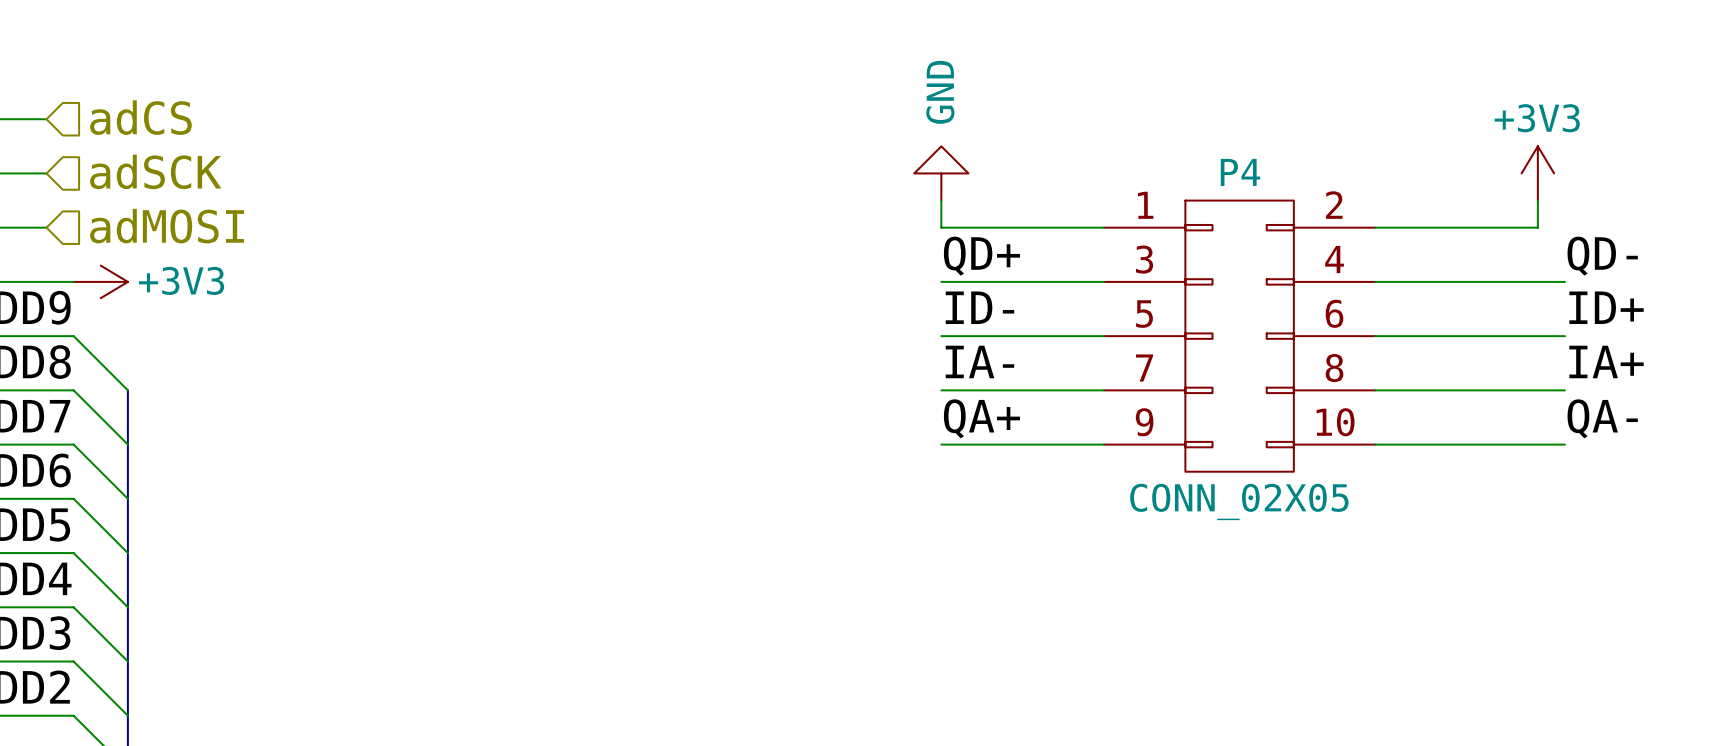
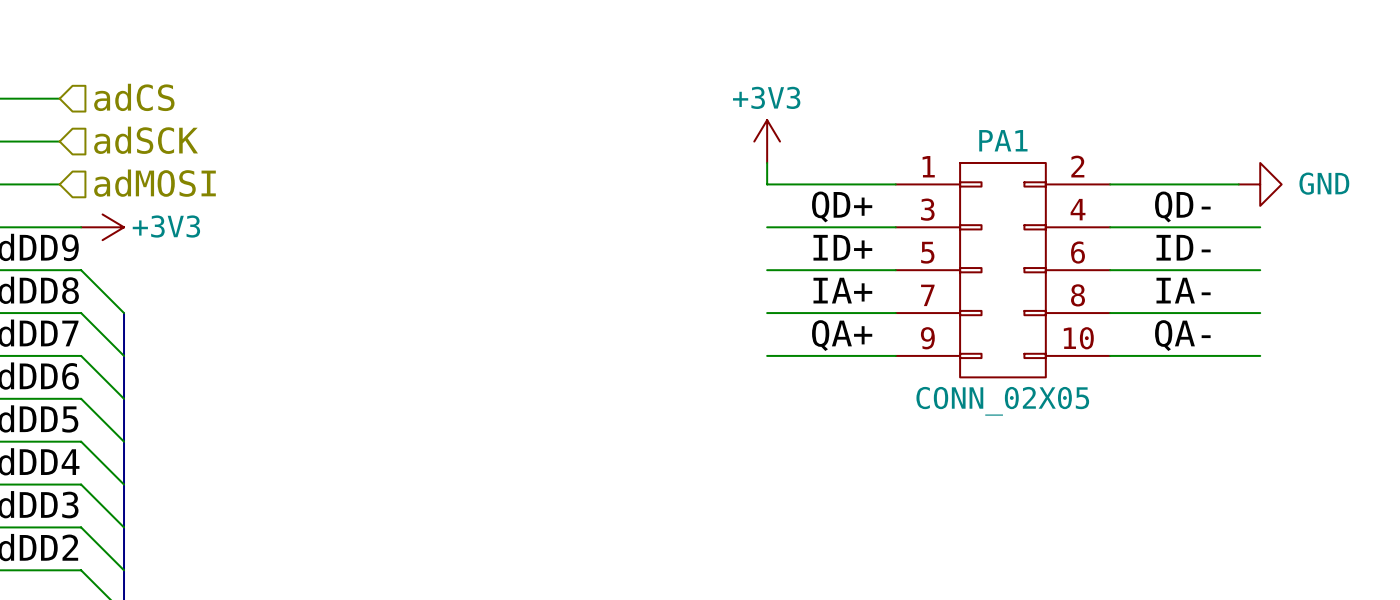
P4 name: P4 (1240, 172) -> PA1 (1003, 140)
power symbol: GND (941, 173) -> +3V3 (767, 141)
power symbol: +3V3 (1537, 173) -> none
wire: (1537, 200) (1537, 227) -> none
power symbol: none -> GND (1260, 184)
label position: QD+ (981, 256) -> QD+ (842, 206)
label position: QD- (1602, 256) -> QD- (1182, 206)
label position: ID- (979, 307) -> ID- (1183, 247)
label: none -> ID+ (842, 247)
label: ID+ (1606, 307) -> none
label position: IA- (979, 361) -> IA- (1183, 290)
label: none -> IA+ (842, 290)
label: IA+ (1606, 361) -> none
label position: QA+ (981, 418) -> QA+ (842, 335)
label position: QA- (1602, 418) -> QA- (1182, 335)

